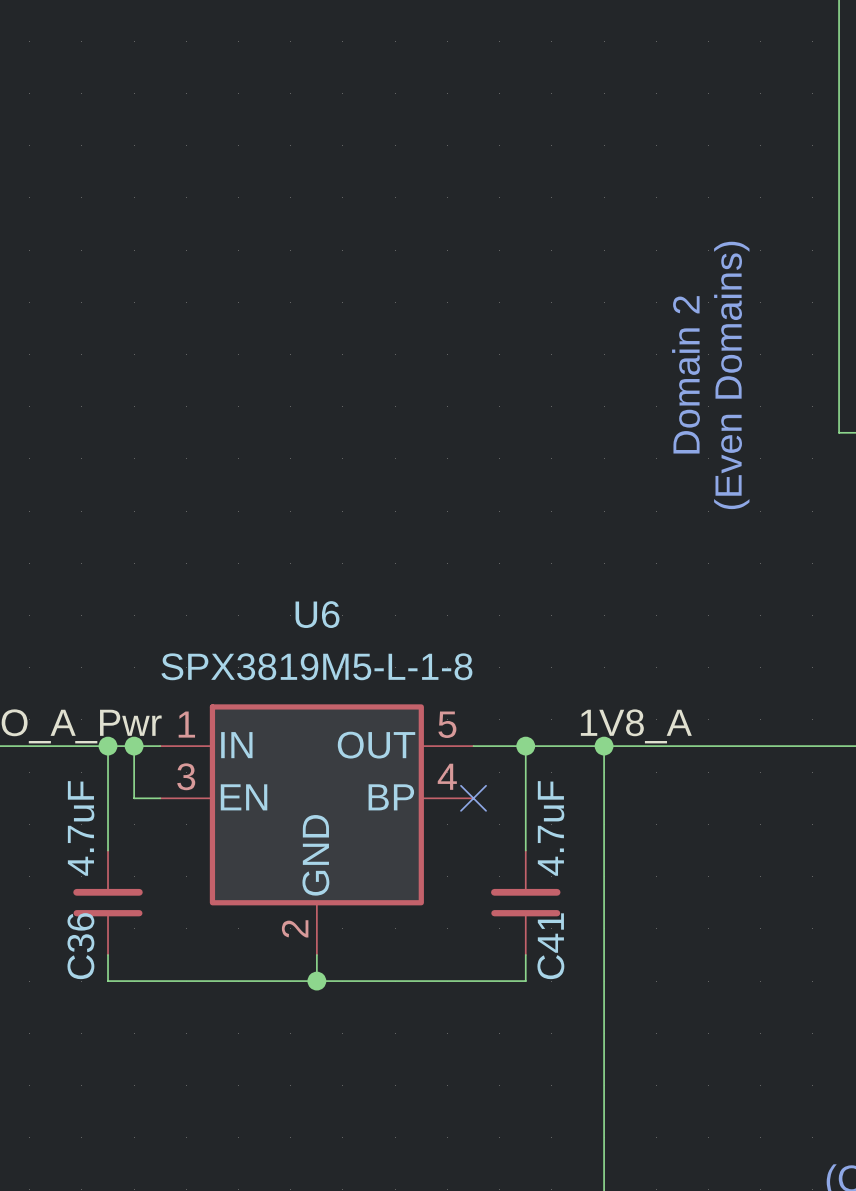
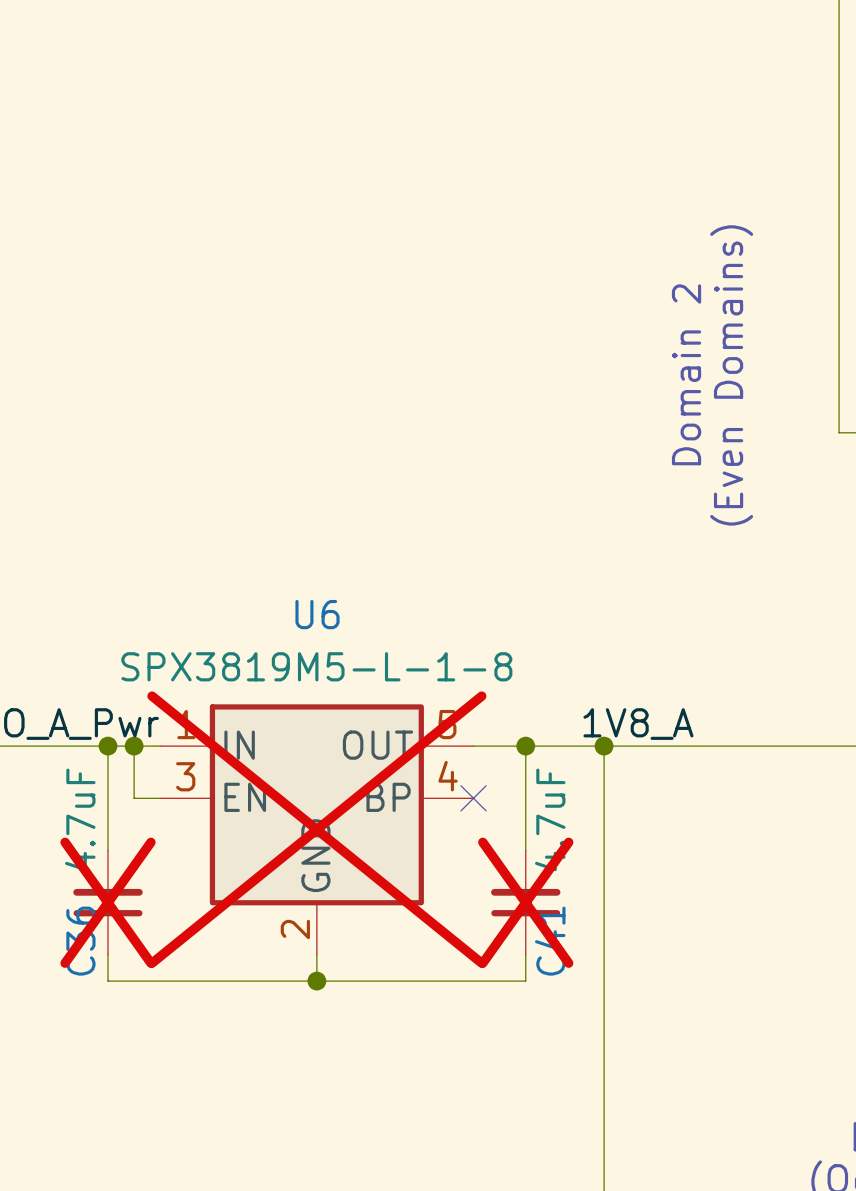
U6 do-not-place cross: none -> (316, 829)
C36 do-not-place cross: none -> (108, 902)
C41 do-not-place cross: none -> (525, 902)

